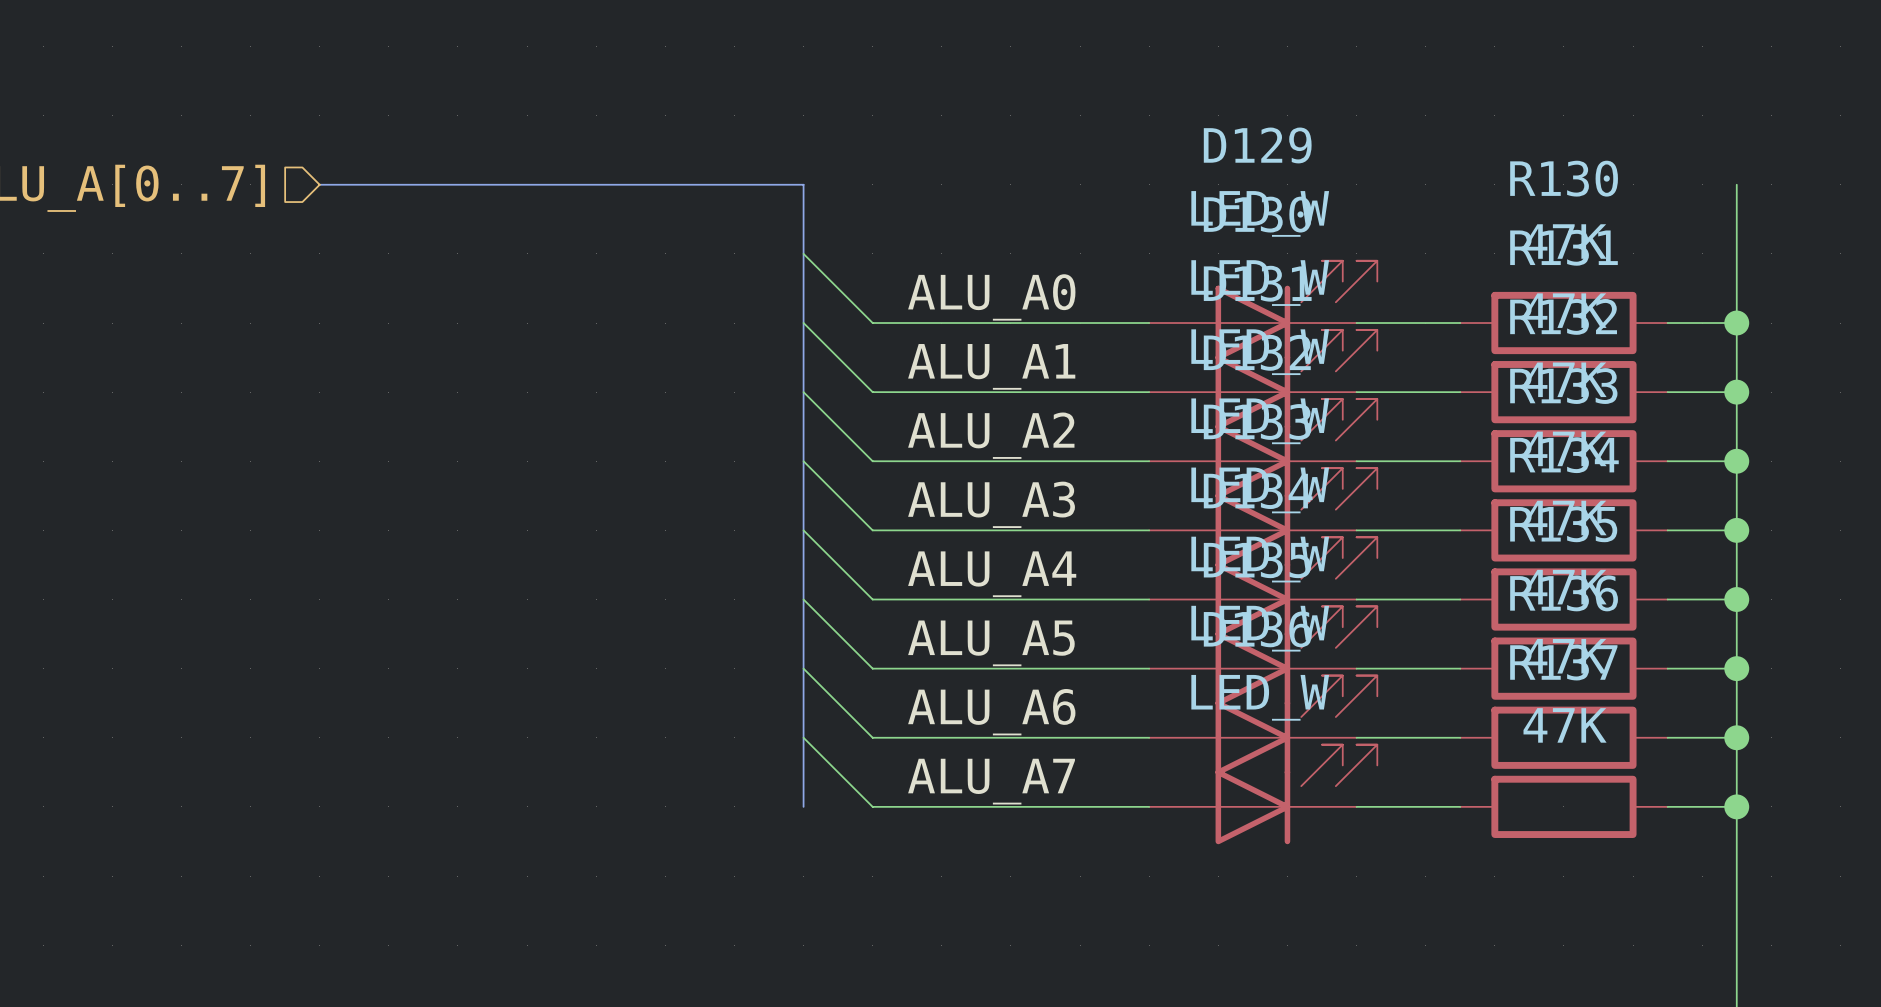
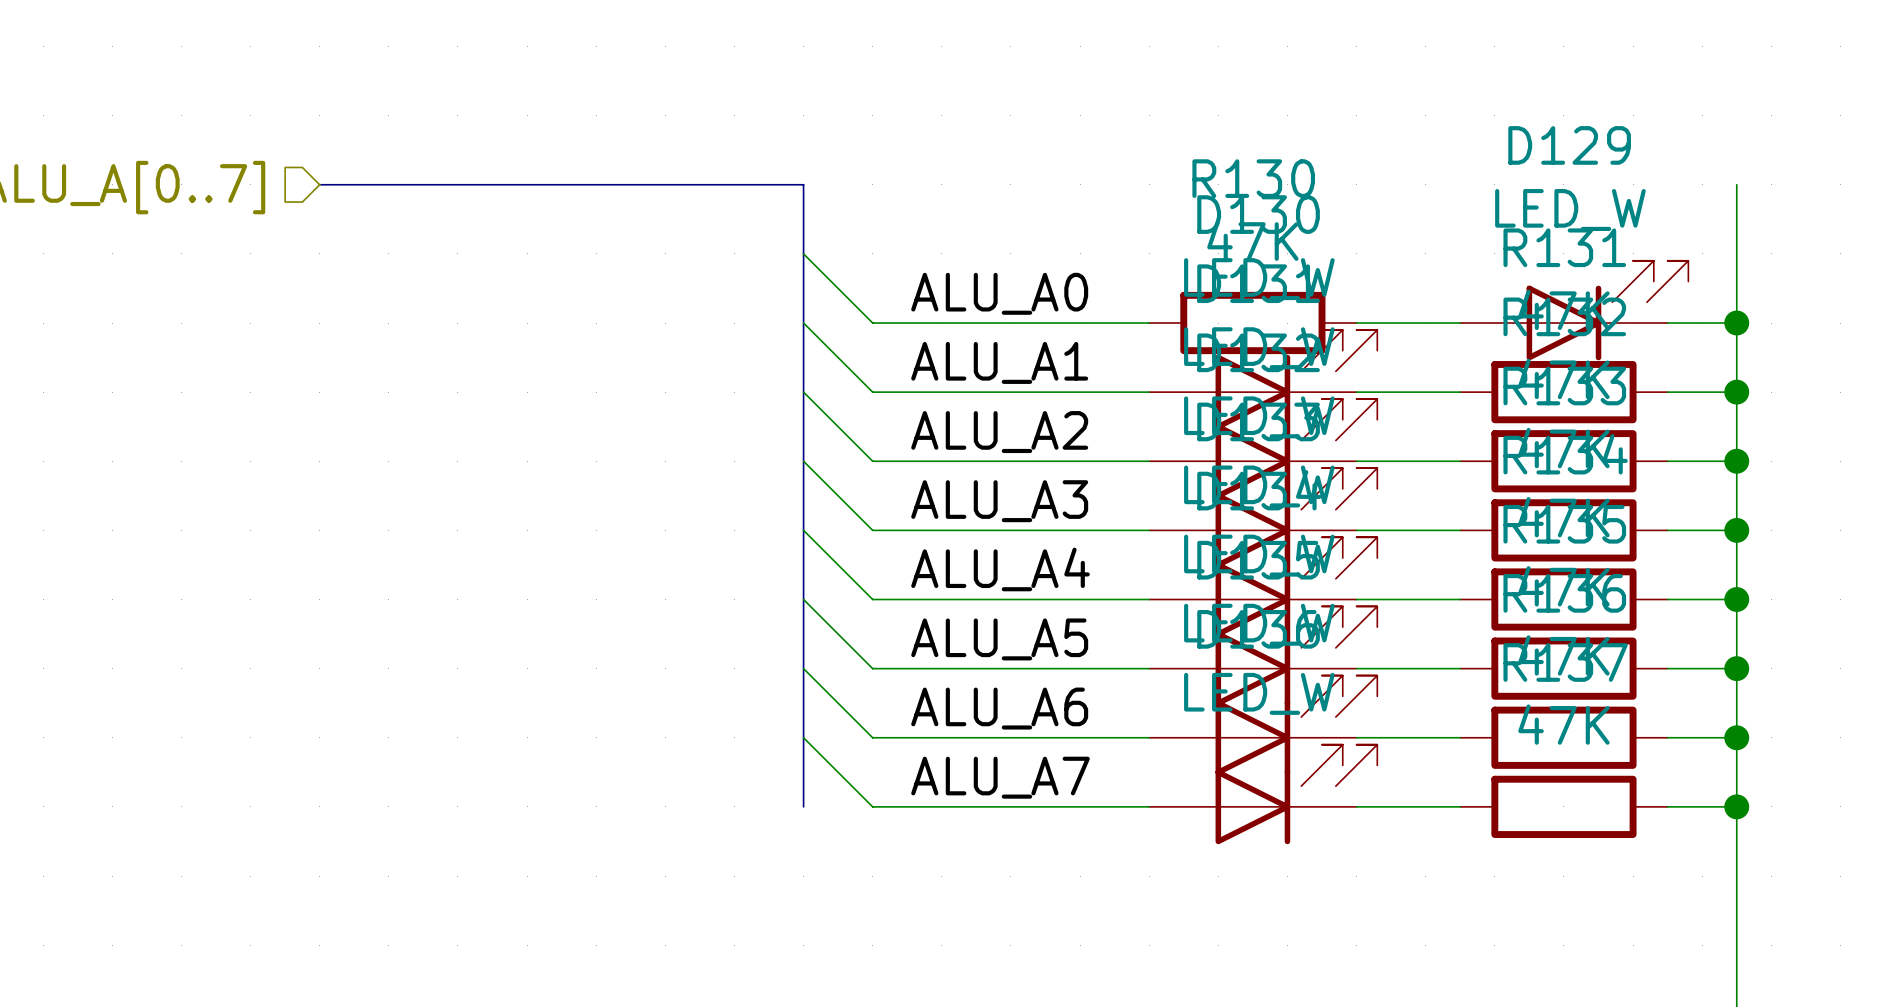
D129 position: (1263, 310) -> (1574, 310)
R130 position: (1563, 323) -> (1252, 323)

